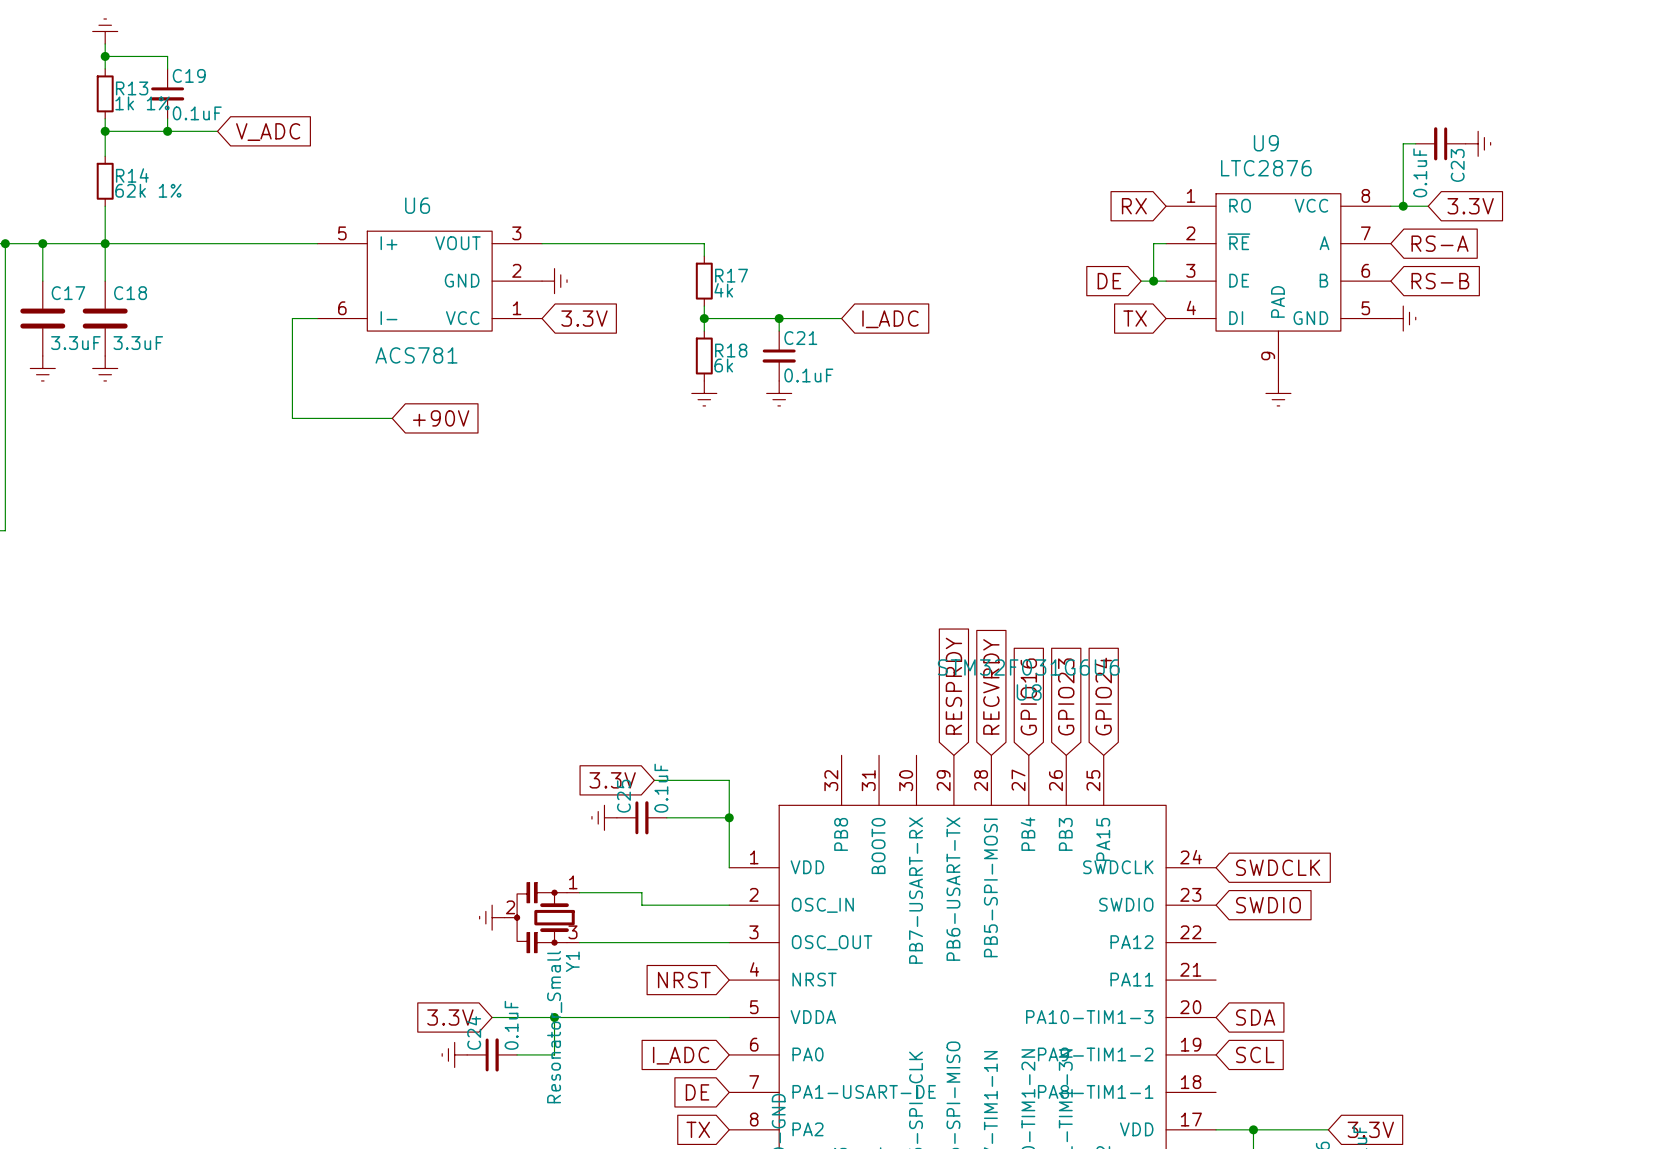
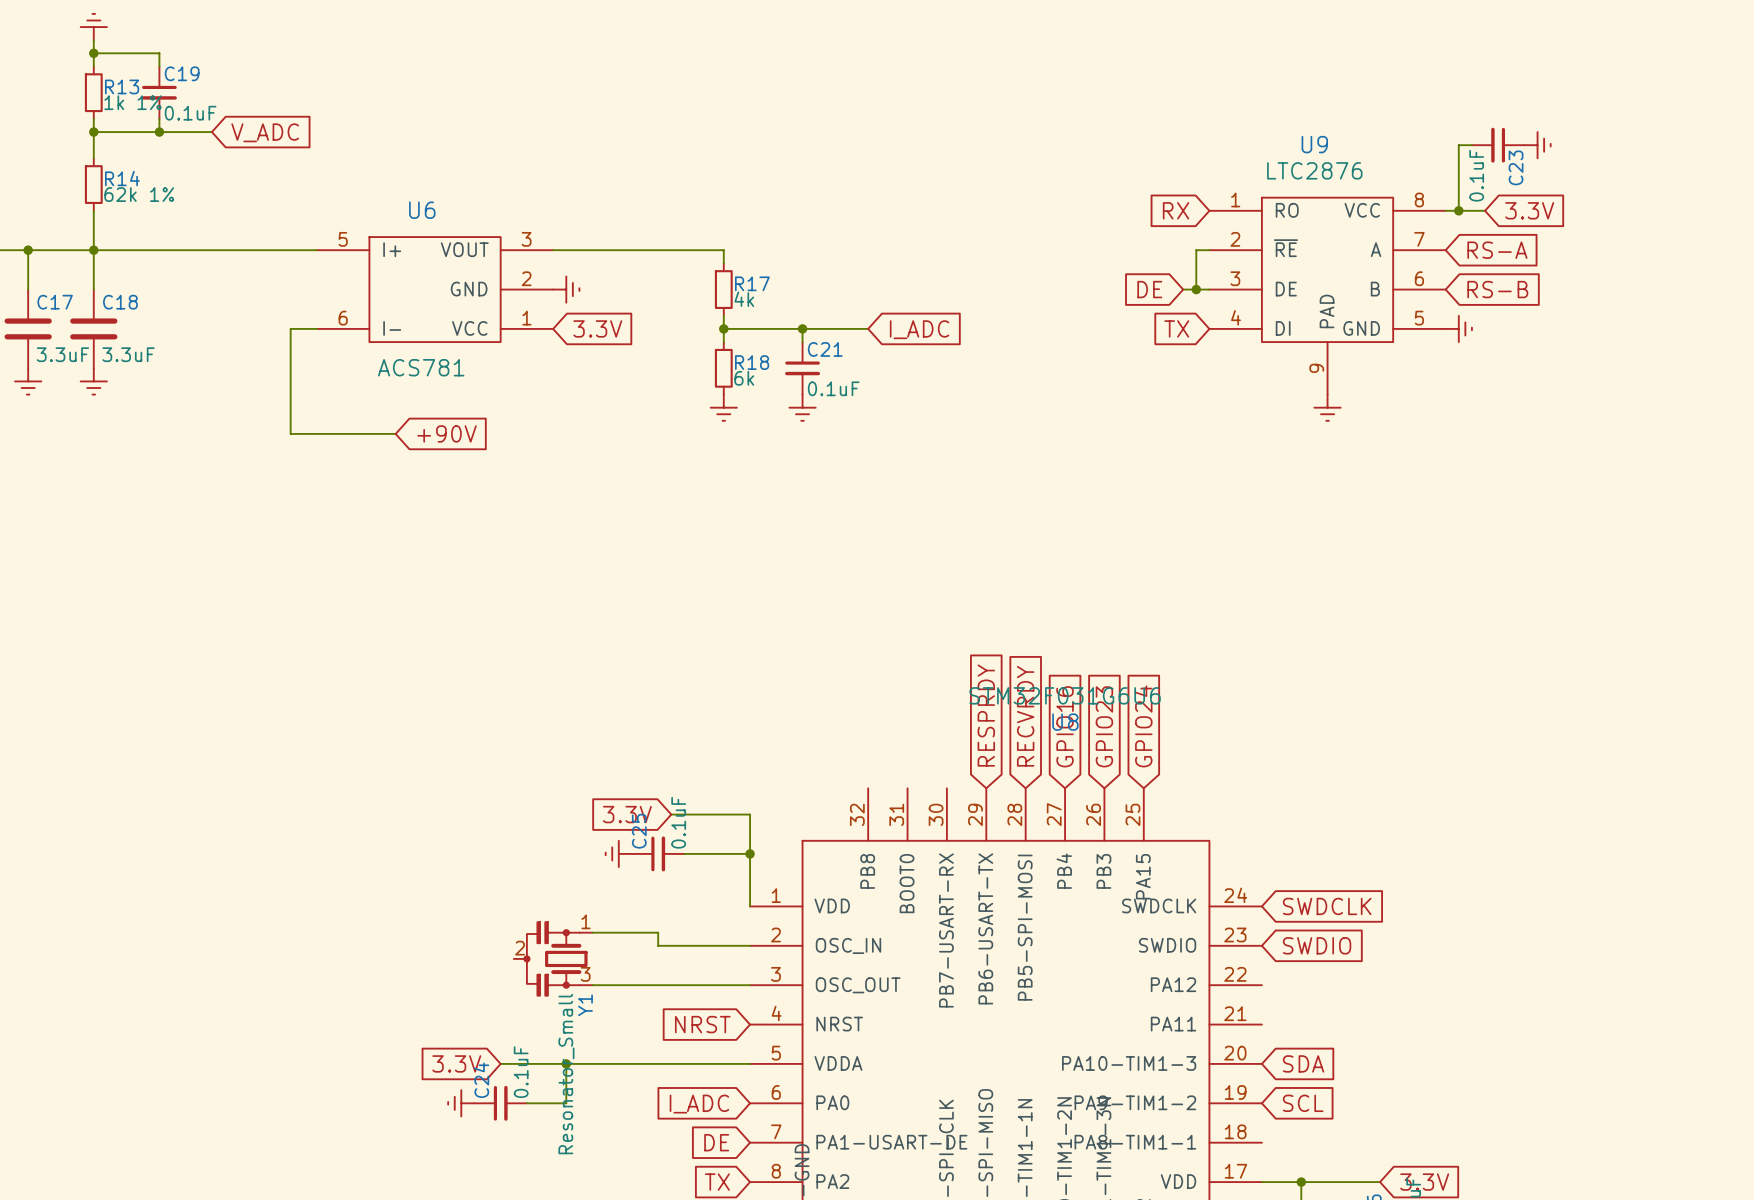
power symbol: (492, 917) -> none

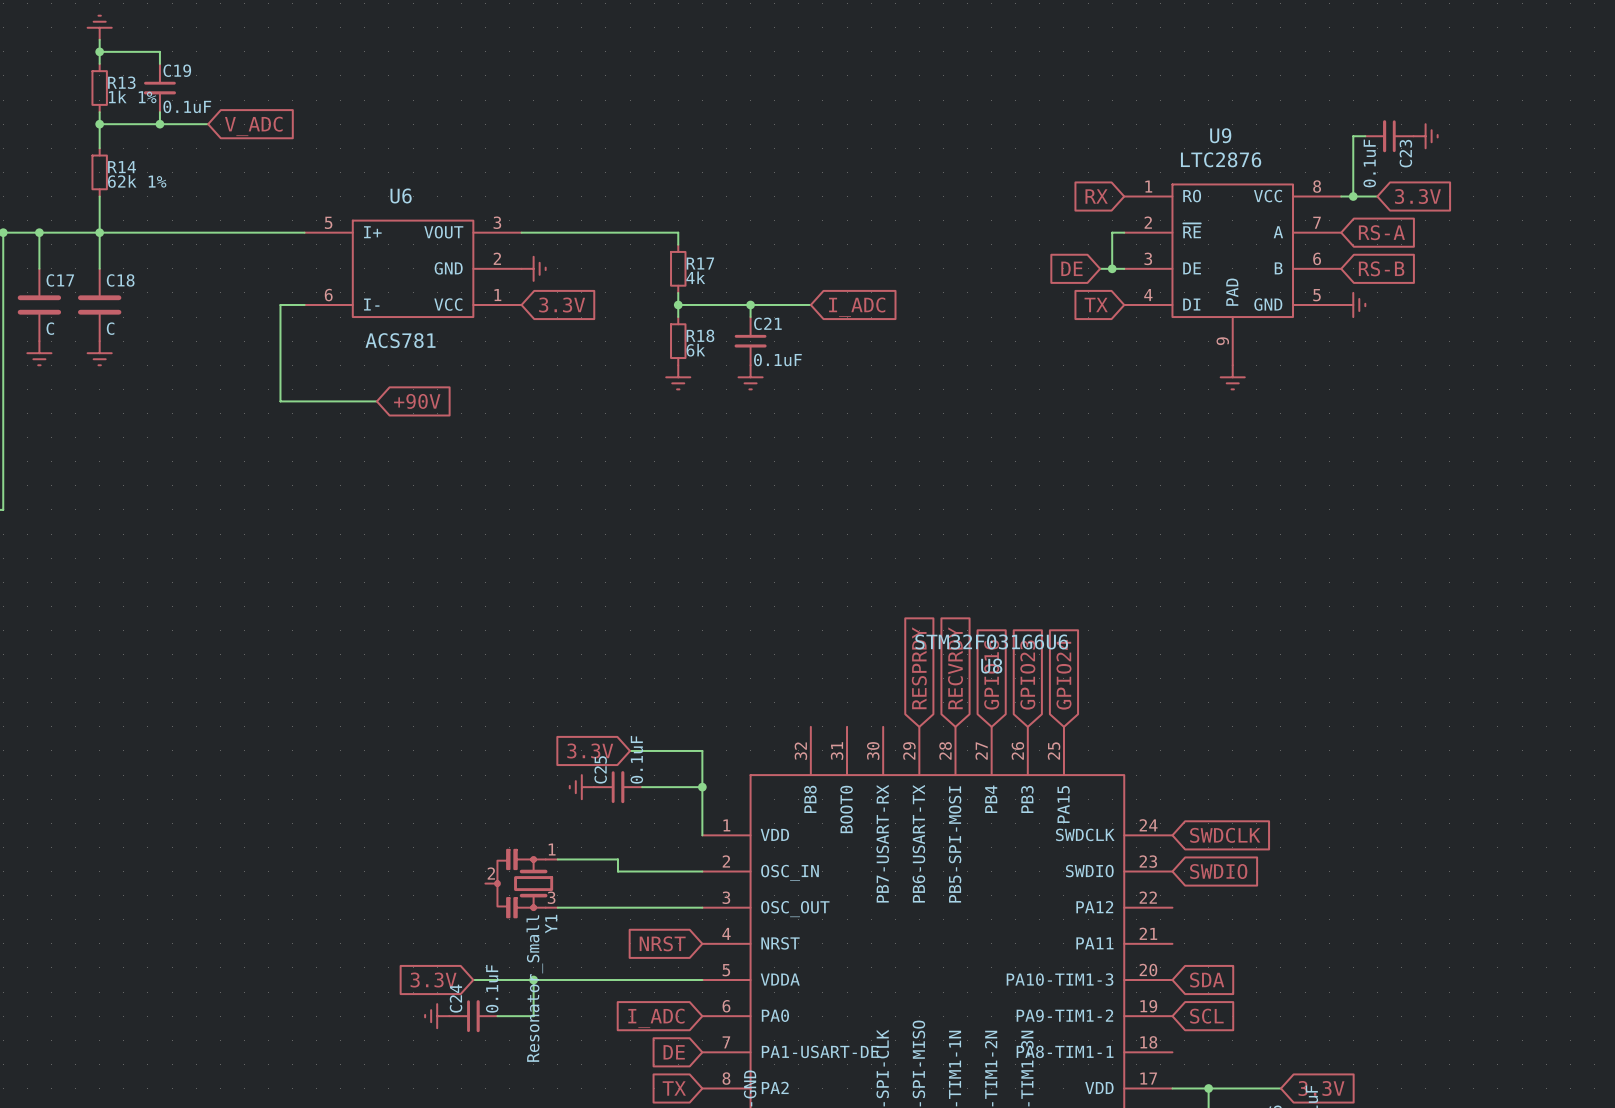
C17 value: 3.3uF (62, 354) -> C (50, 328)
C18 value: 3.3uF (128, 354) -> C (110, 328)

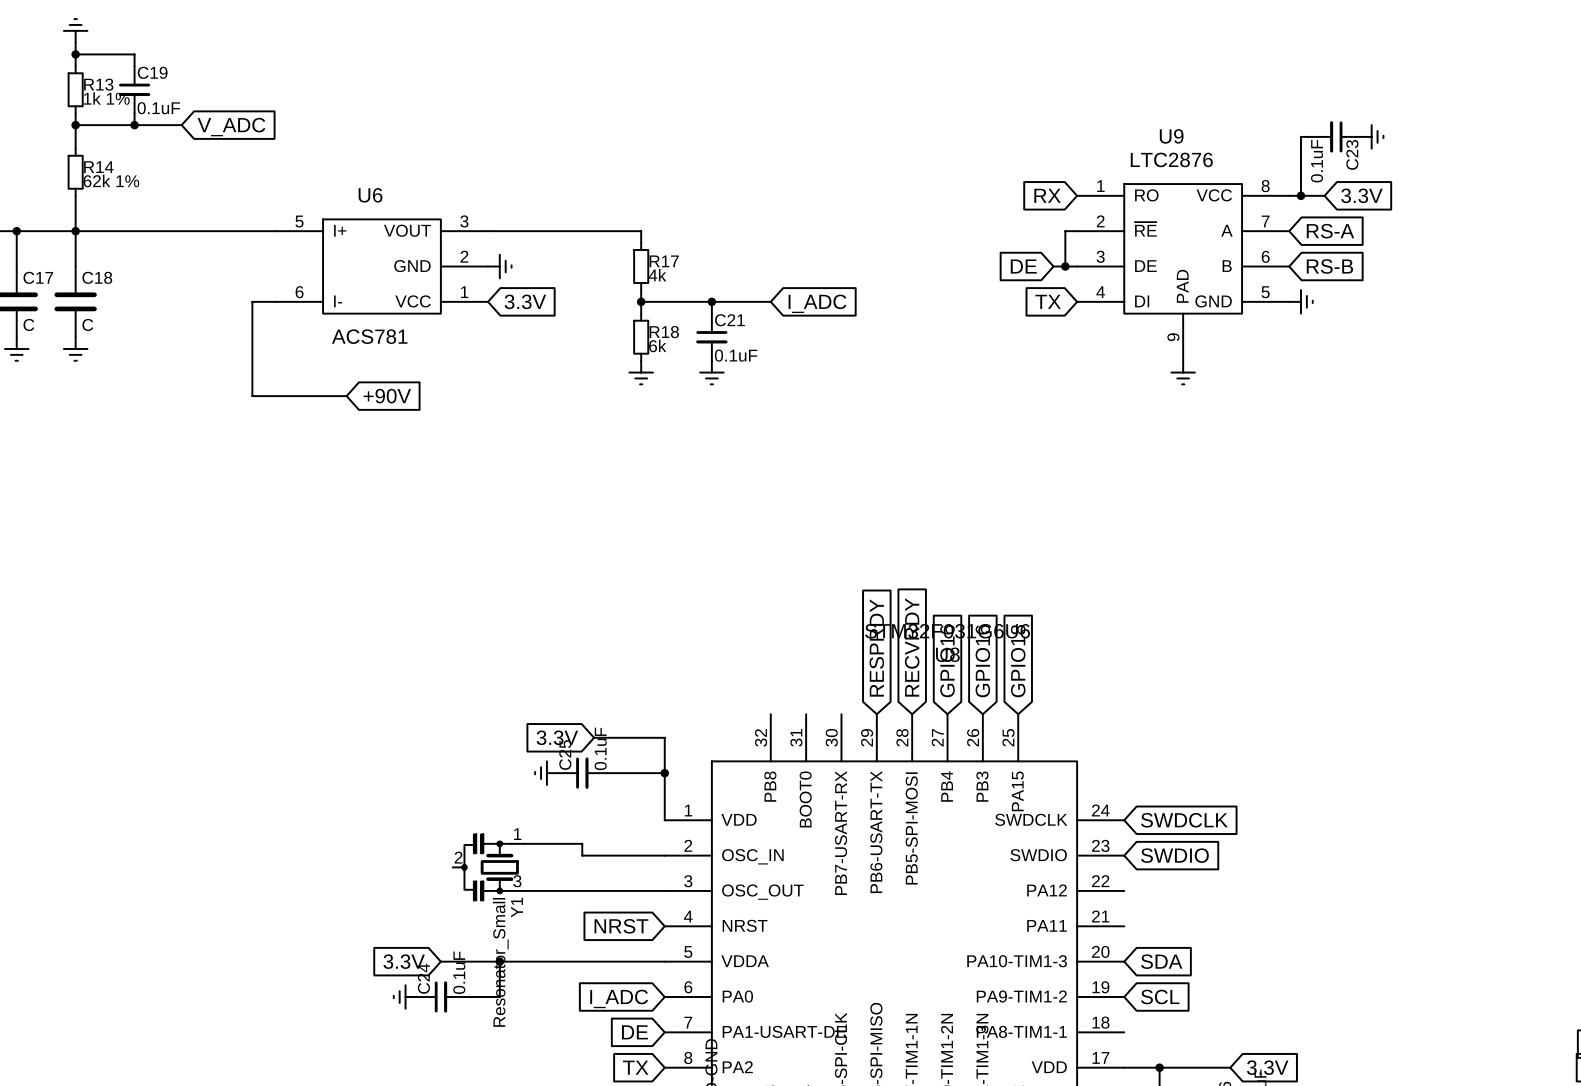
global label: GPIO24 (1063, 674) -> GPIO18 (1018, 661)
global label: GPIO23 (1027, 675) -> GPIO16 (982, 661)

